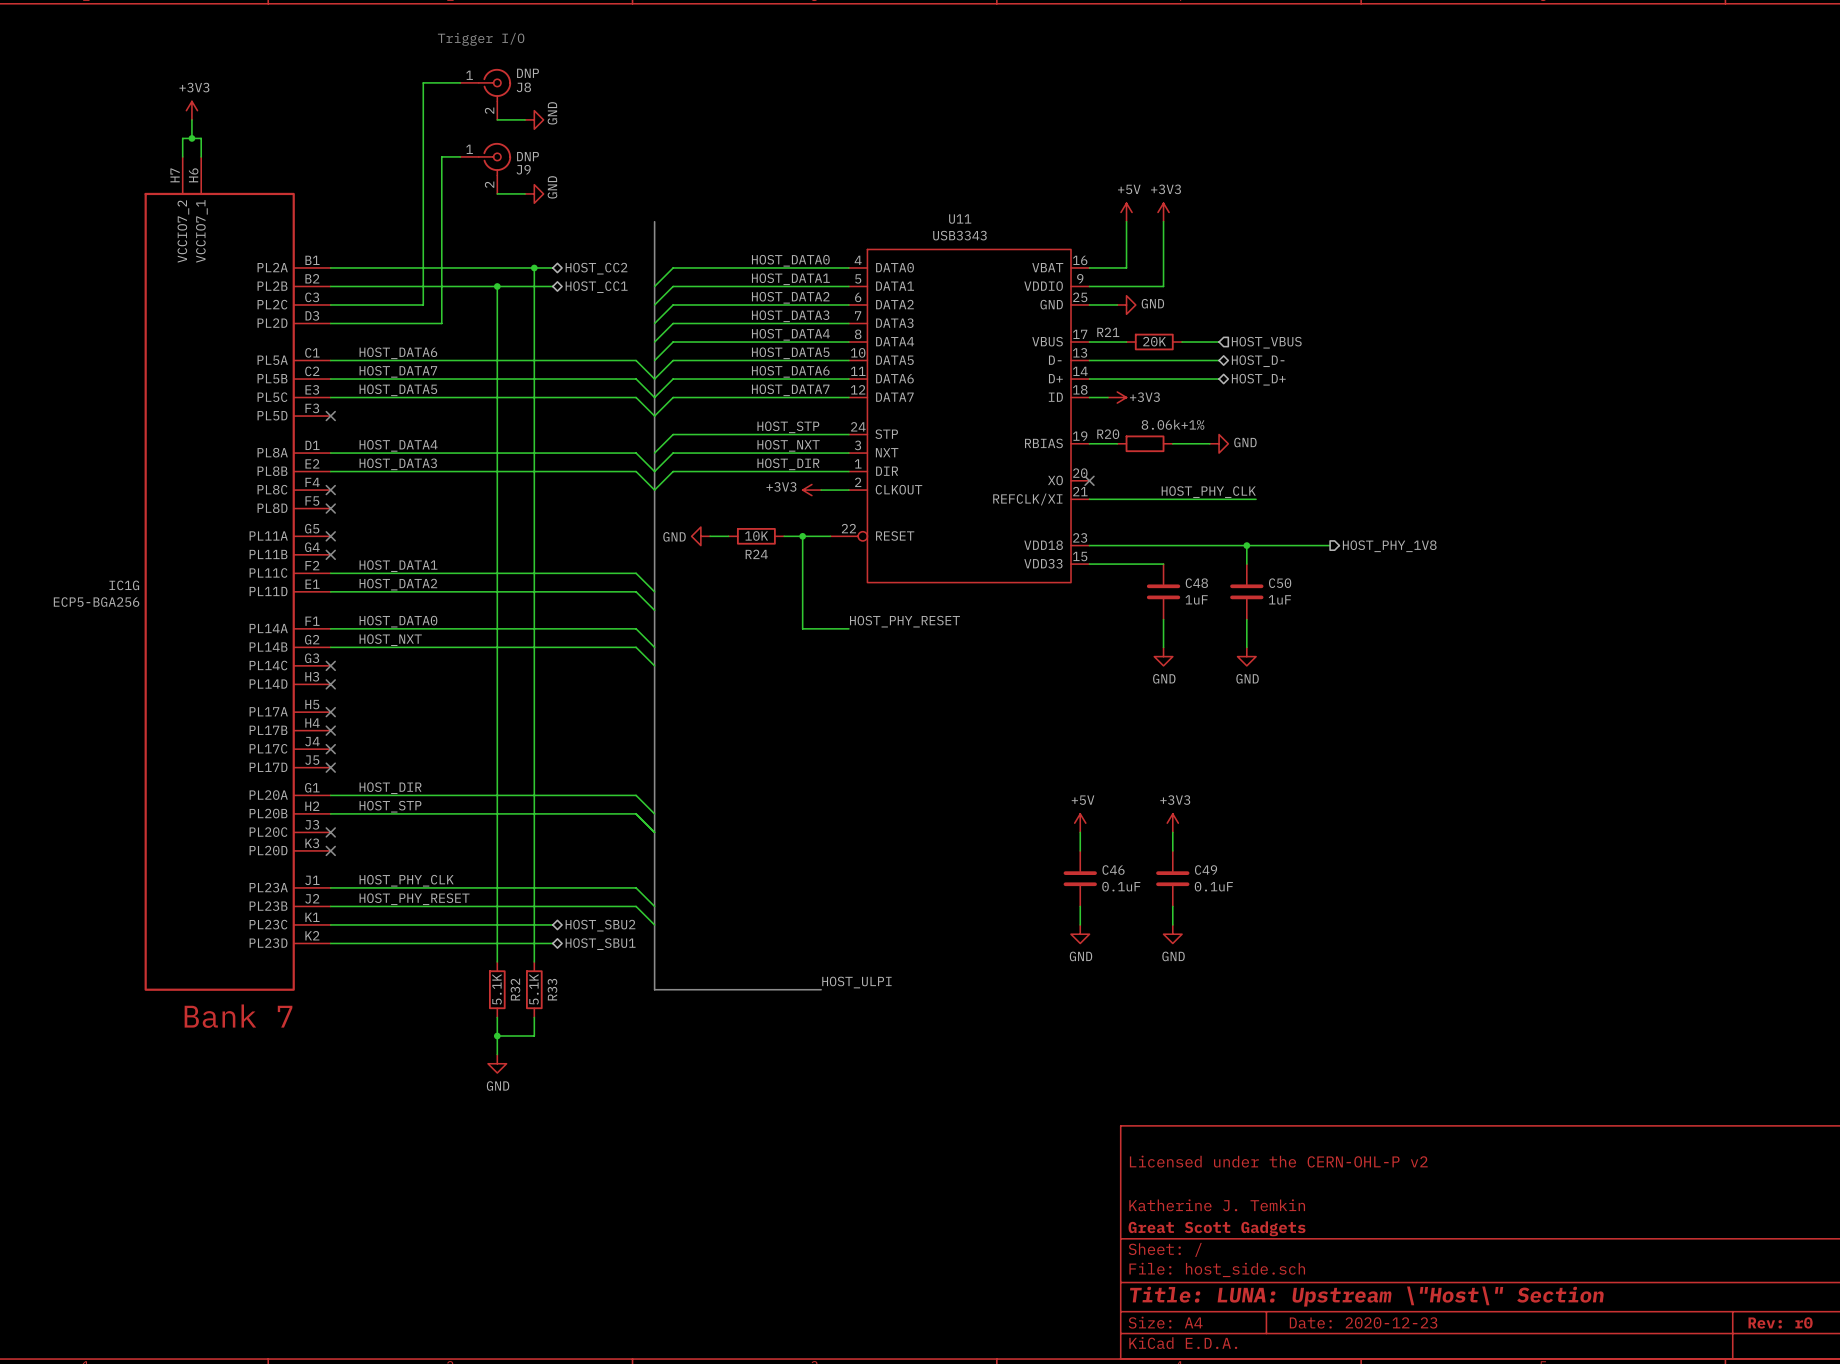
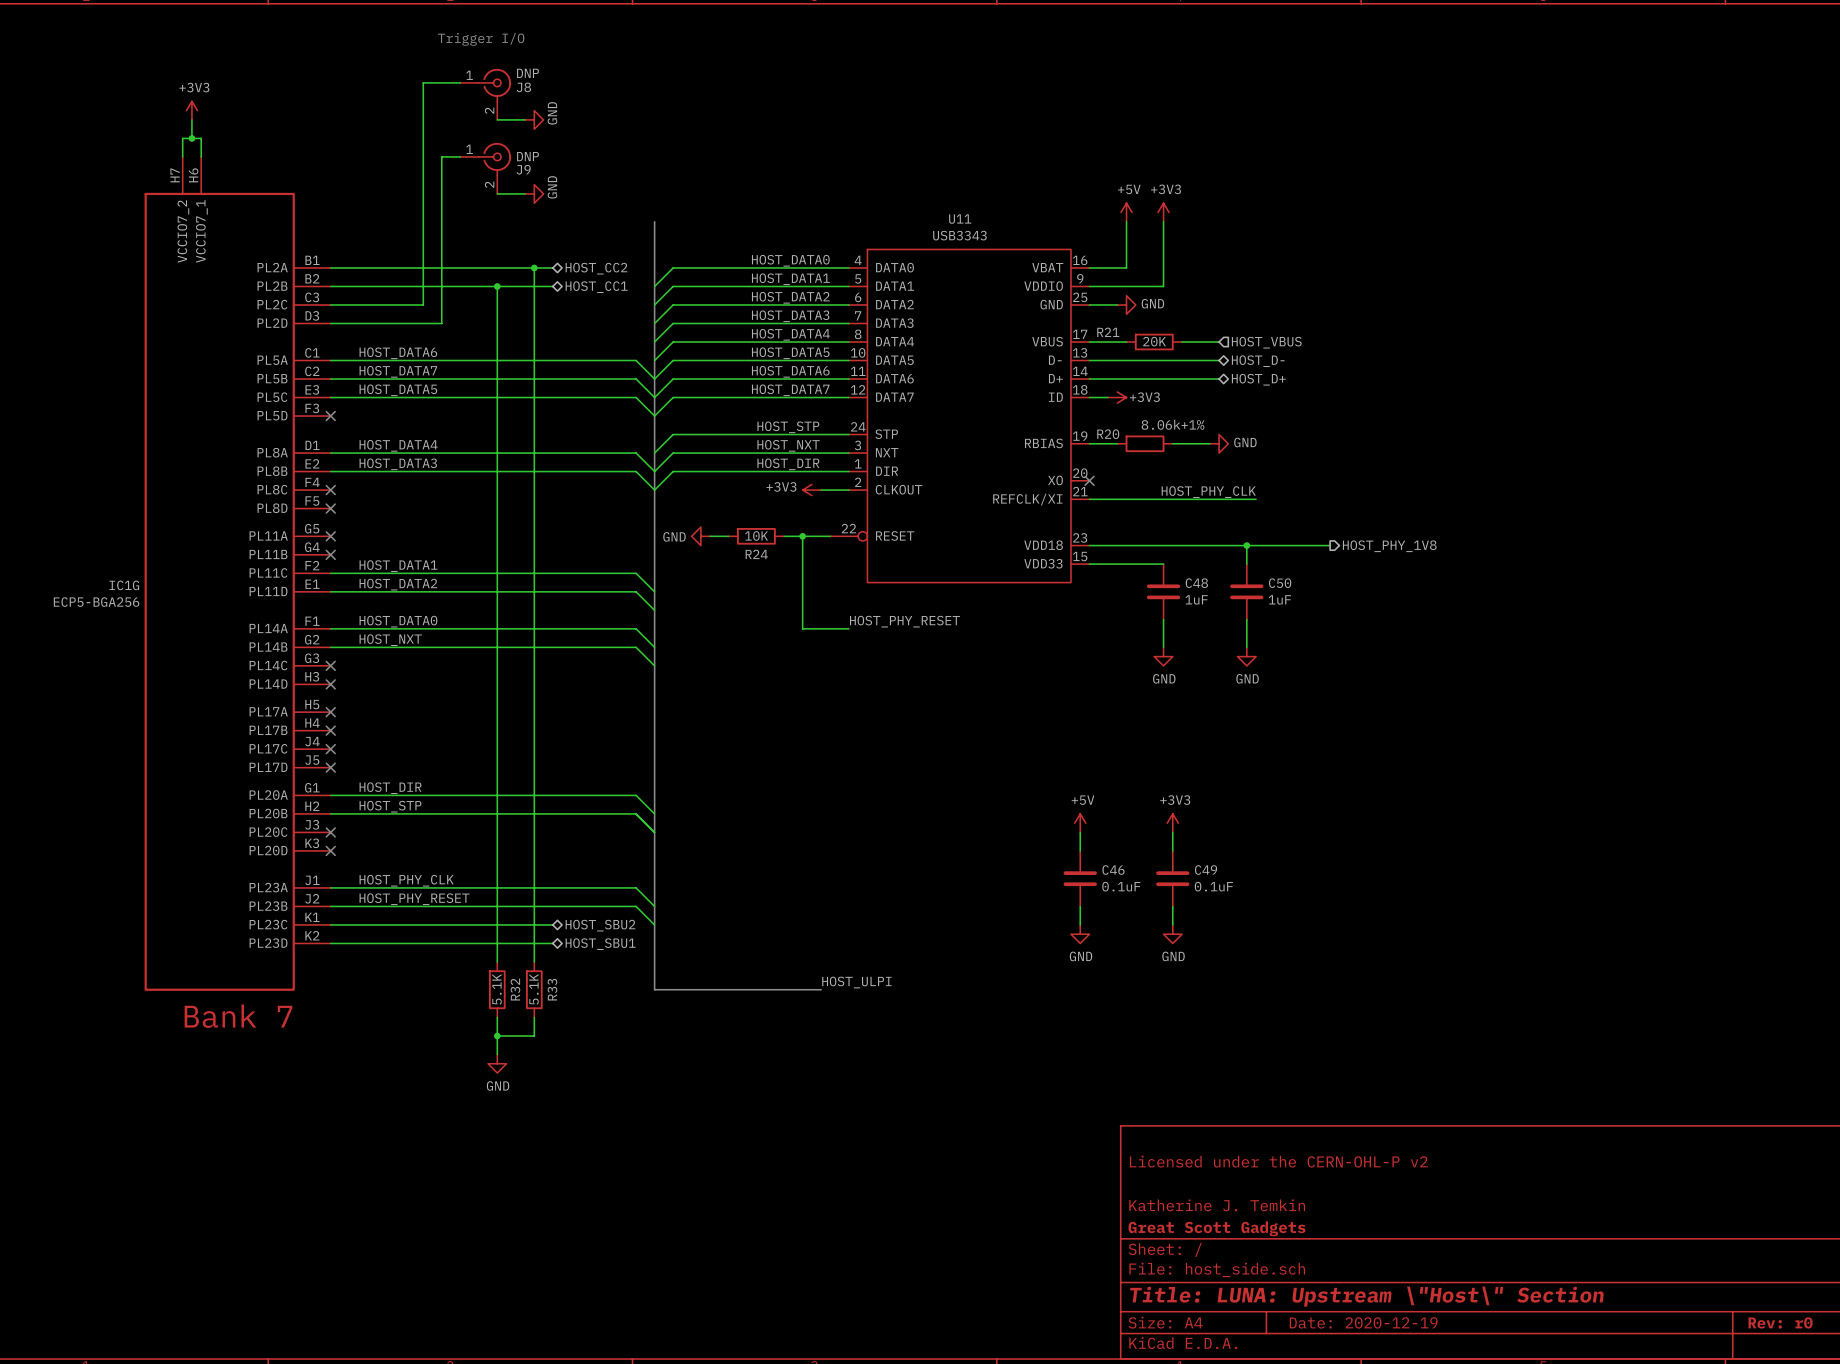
title block: Date: 2020-12-23 (1363, 1322) -> Date: 2020-12-19 (1363, 1322)

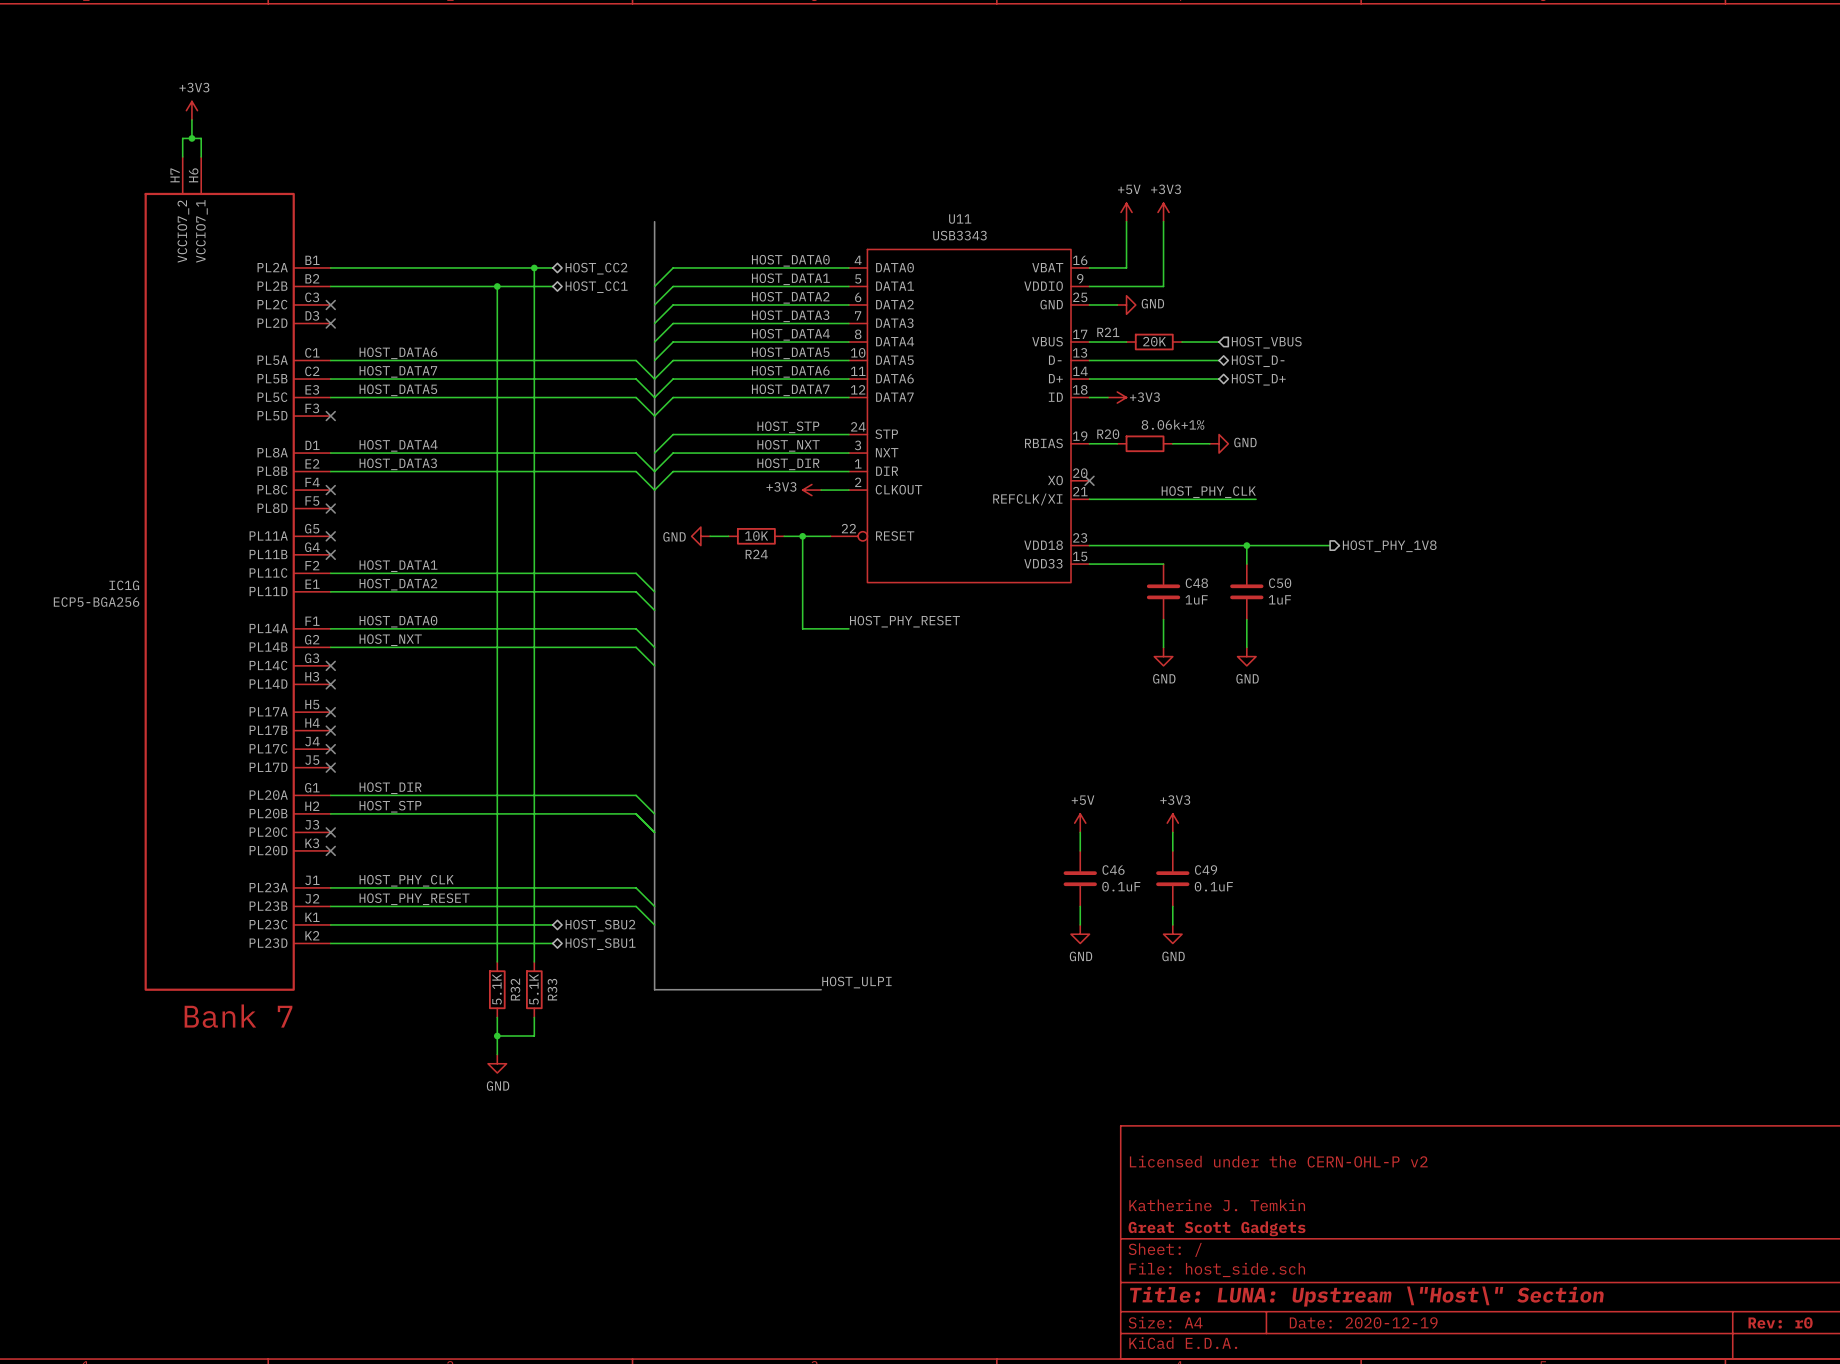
text: Trigger I/O (481, 39) -> none
wire: (460, 82) (423, 82) (423, 304) (330, 304) -> none
J8: (485, 94) -> none
wire: (497, 119) (525, 119) -> none
power symbol: GND (534, 119) -> none
wire: (460, 156) (441, 156) (441, 323) (330, 323) -> none
J9: (485, 168) -> none
wire: (497, 193) (525, 193) -> none
power symbol: GND (534, 193) -> none
no-connect mark: none -> (330, 304)
no-connect mark: none -> (330, 323)

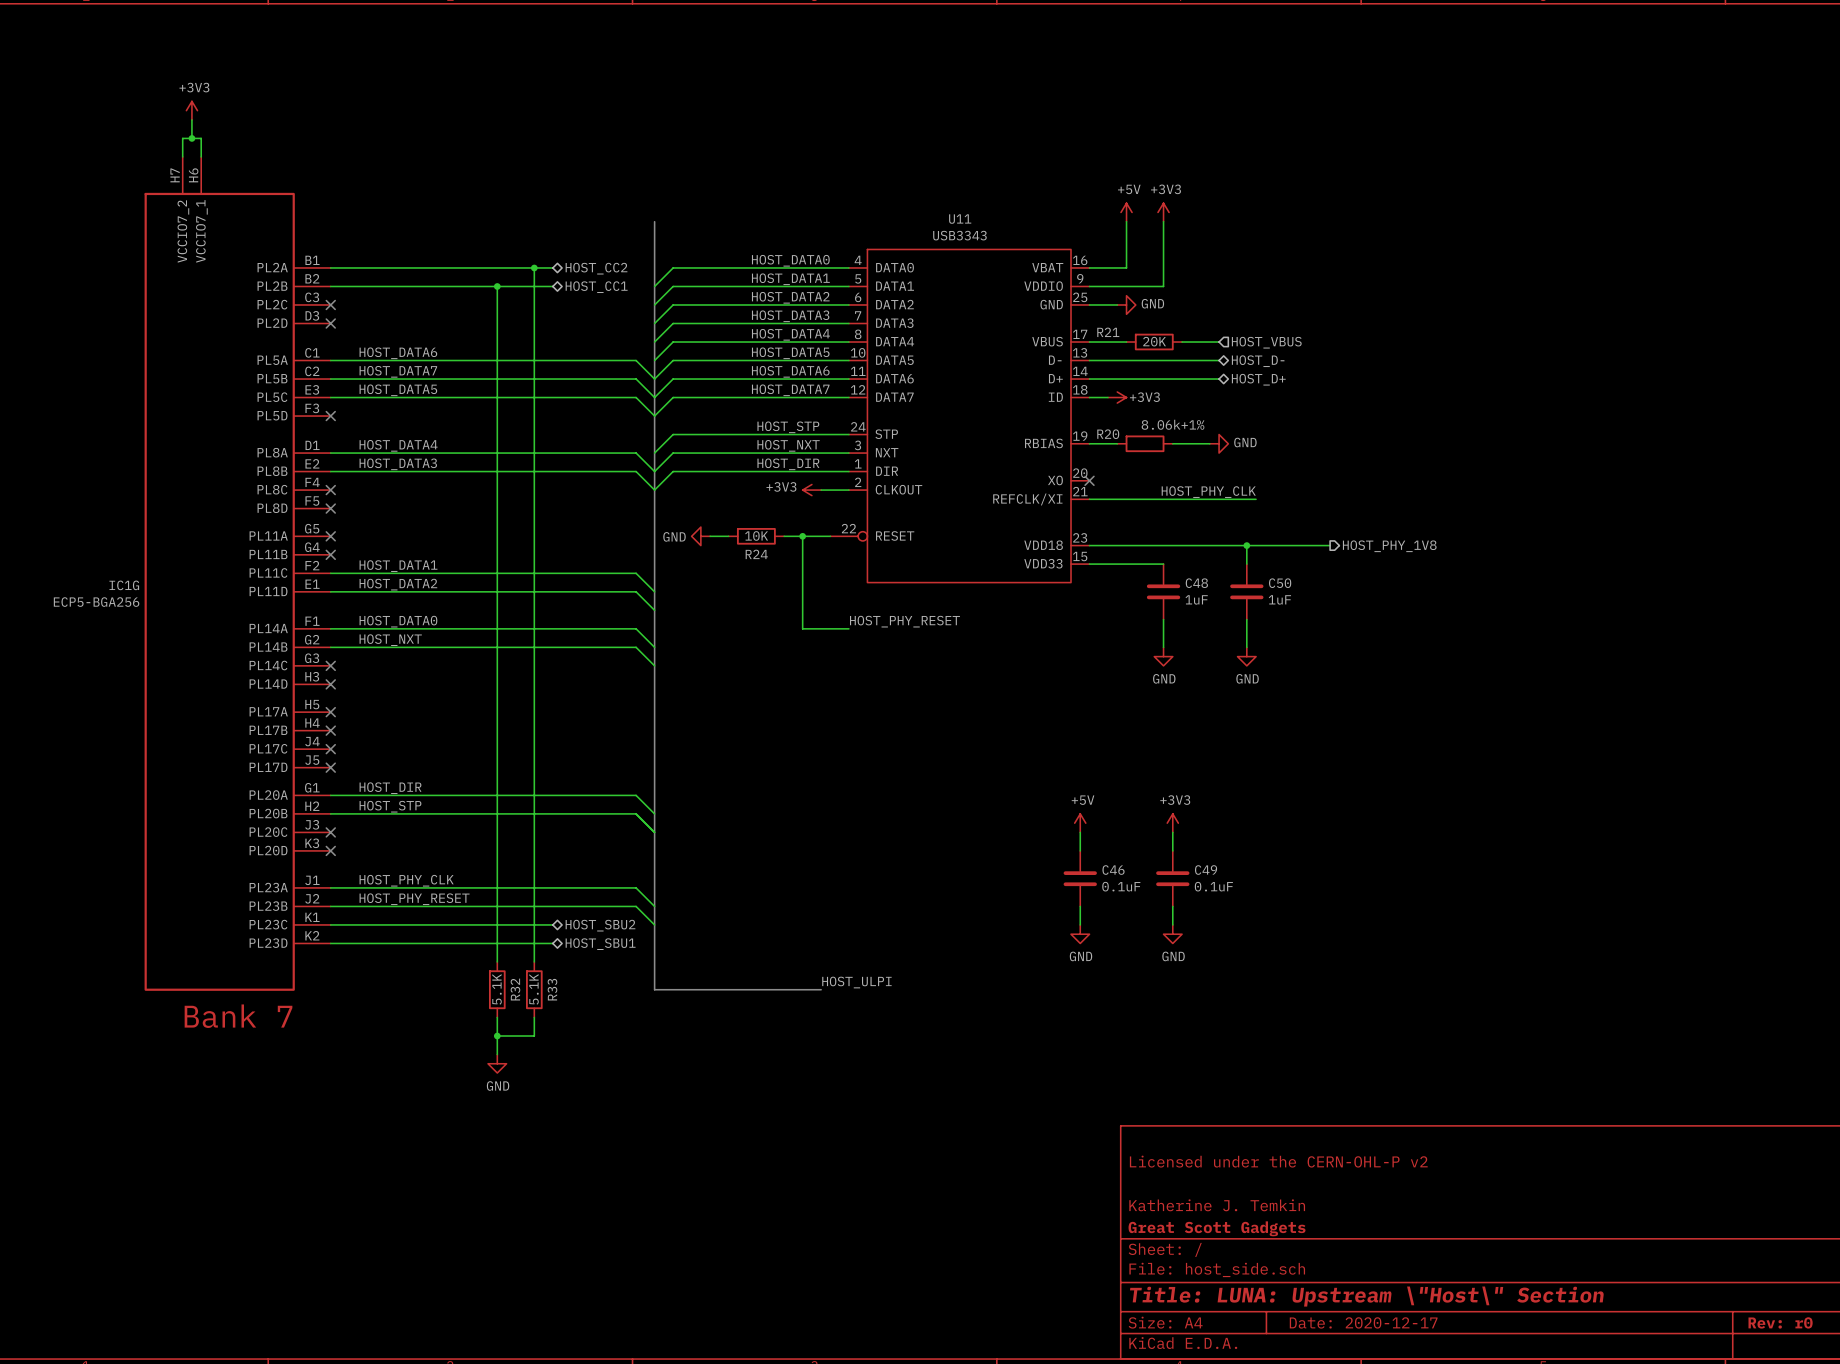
title block: Date: 2020-12-19 (1363, 1322) -> Date: 2020-12-17 (1363, 1322)

